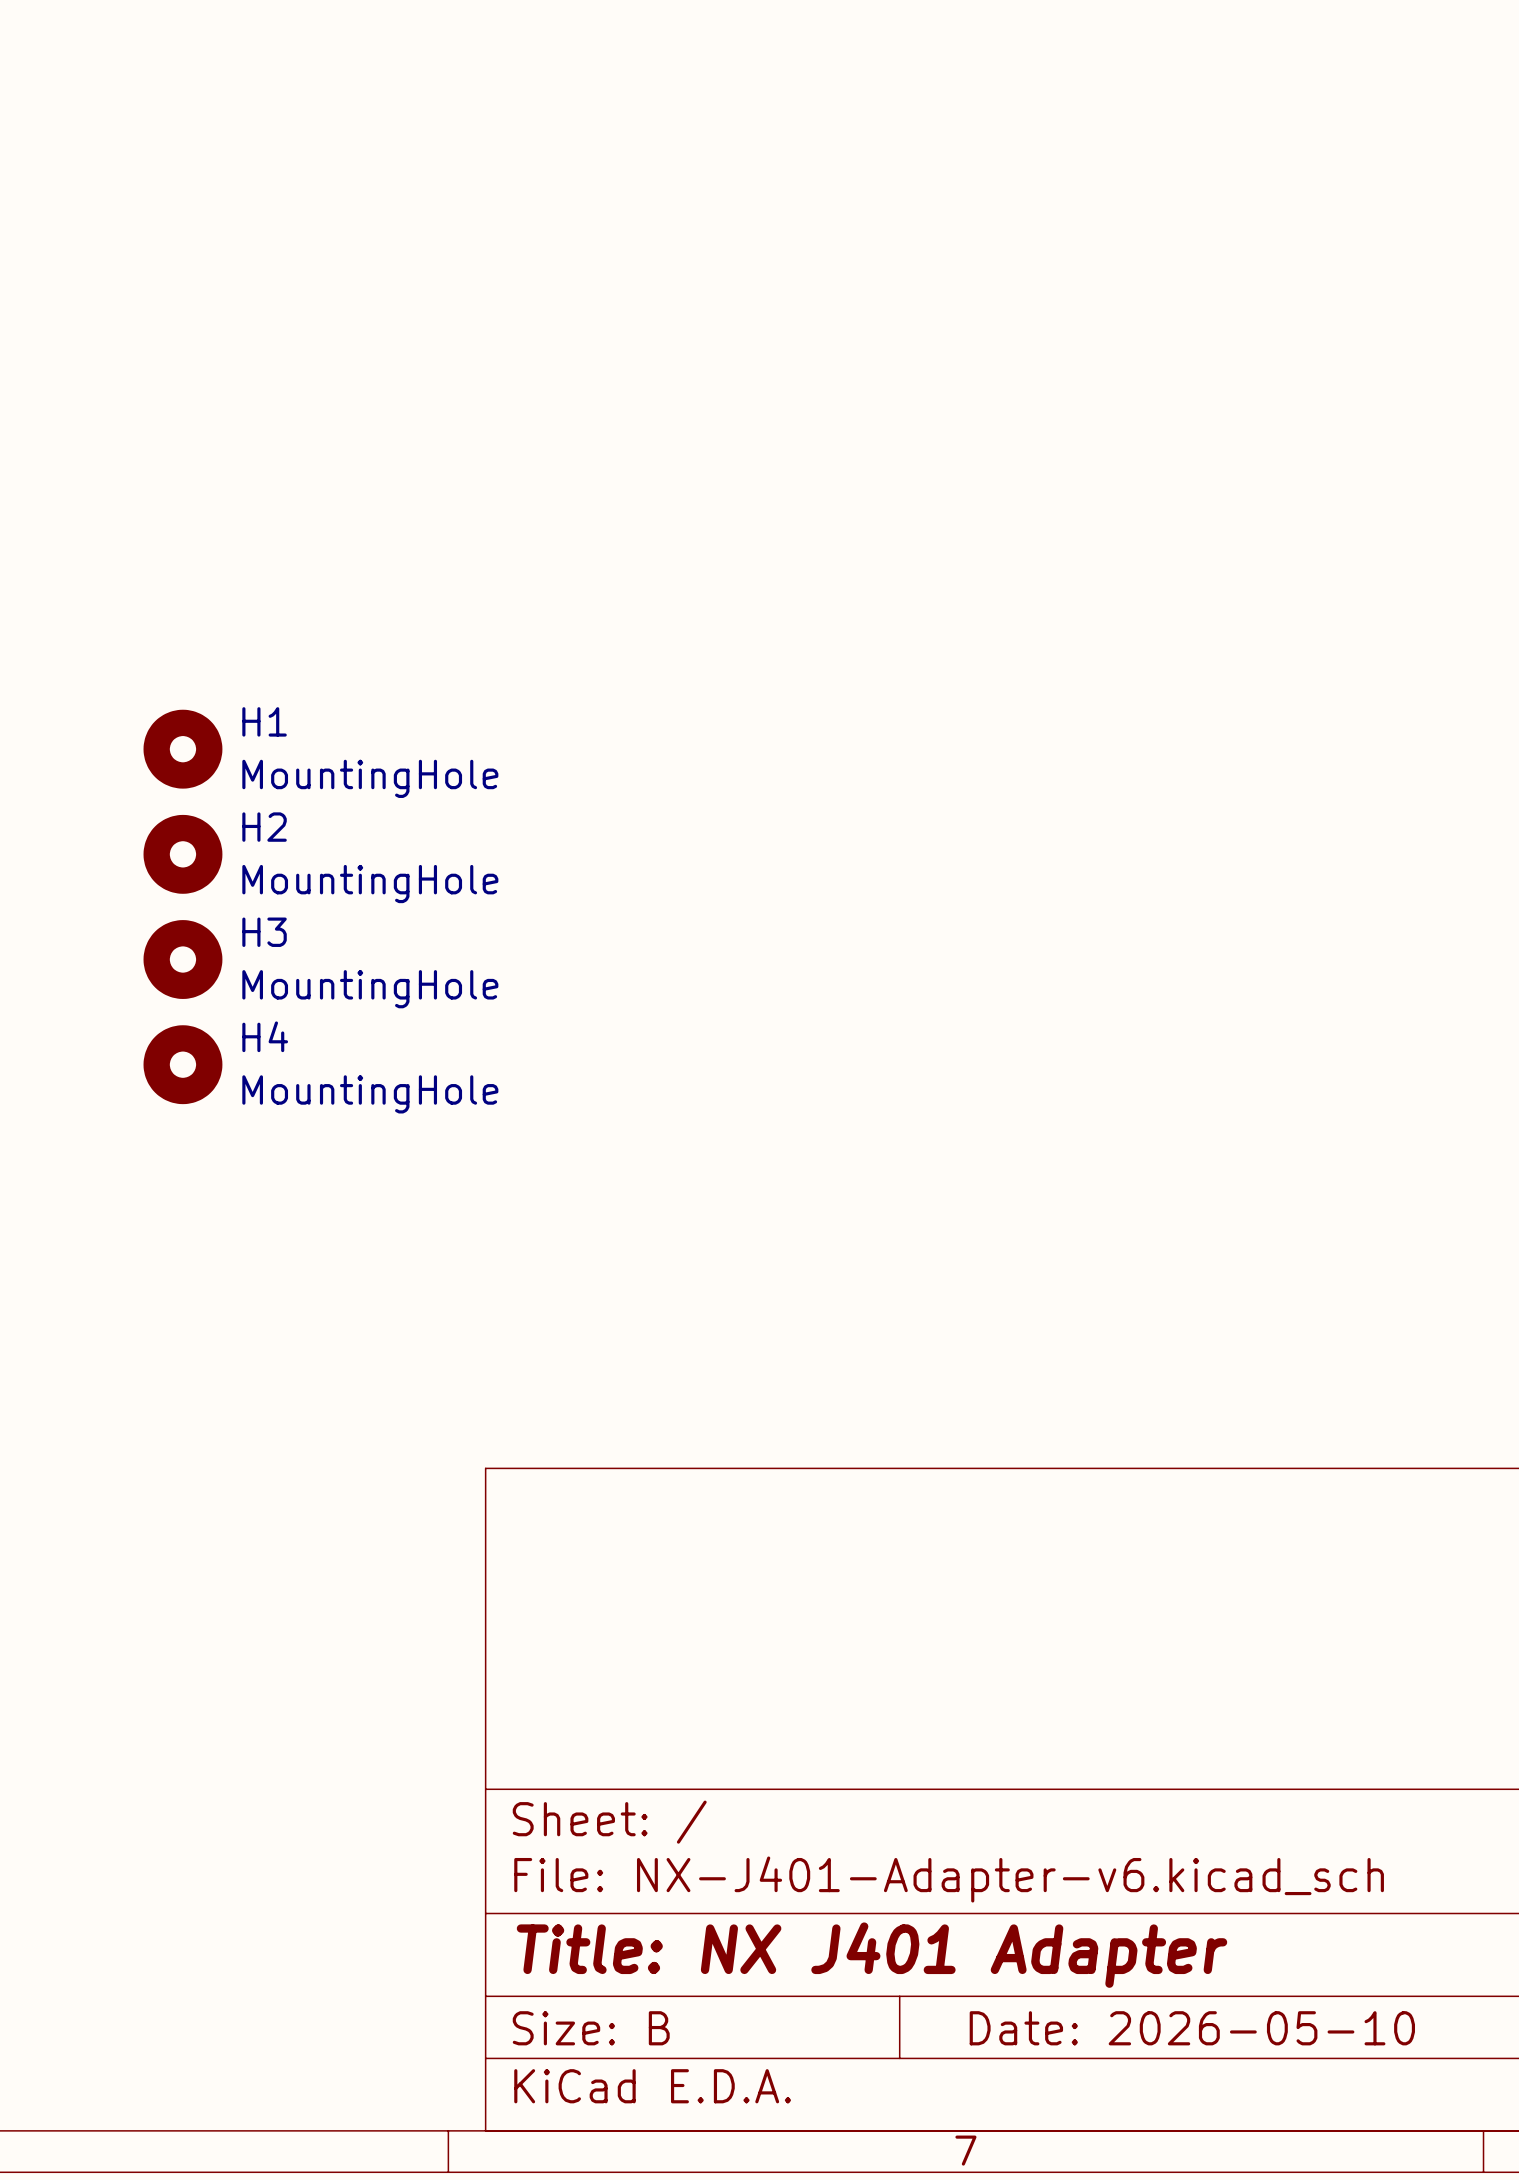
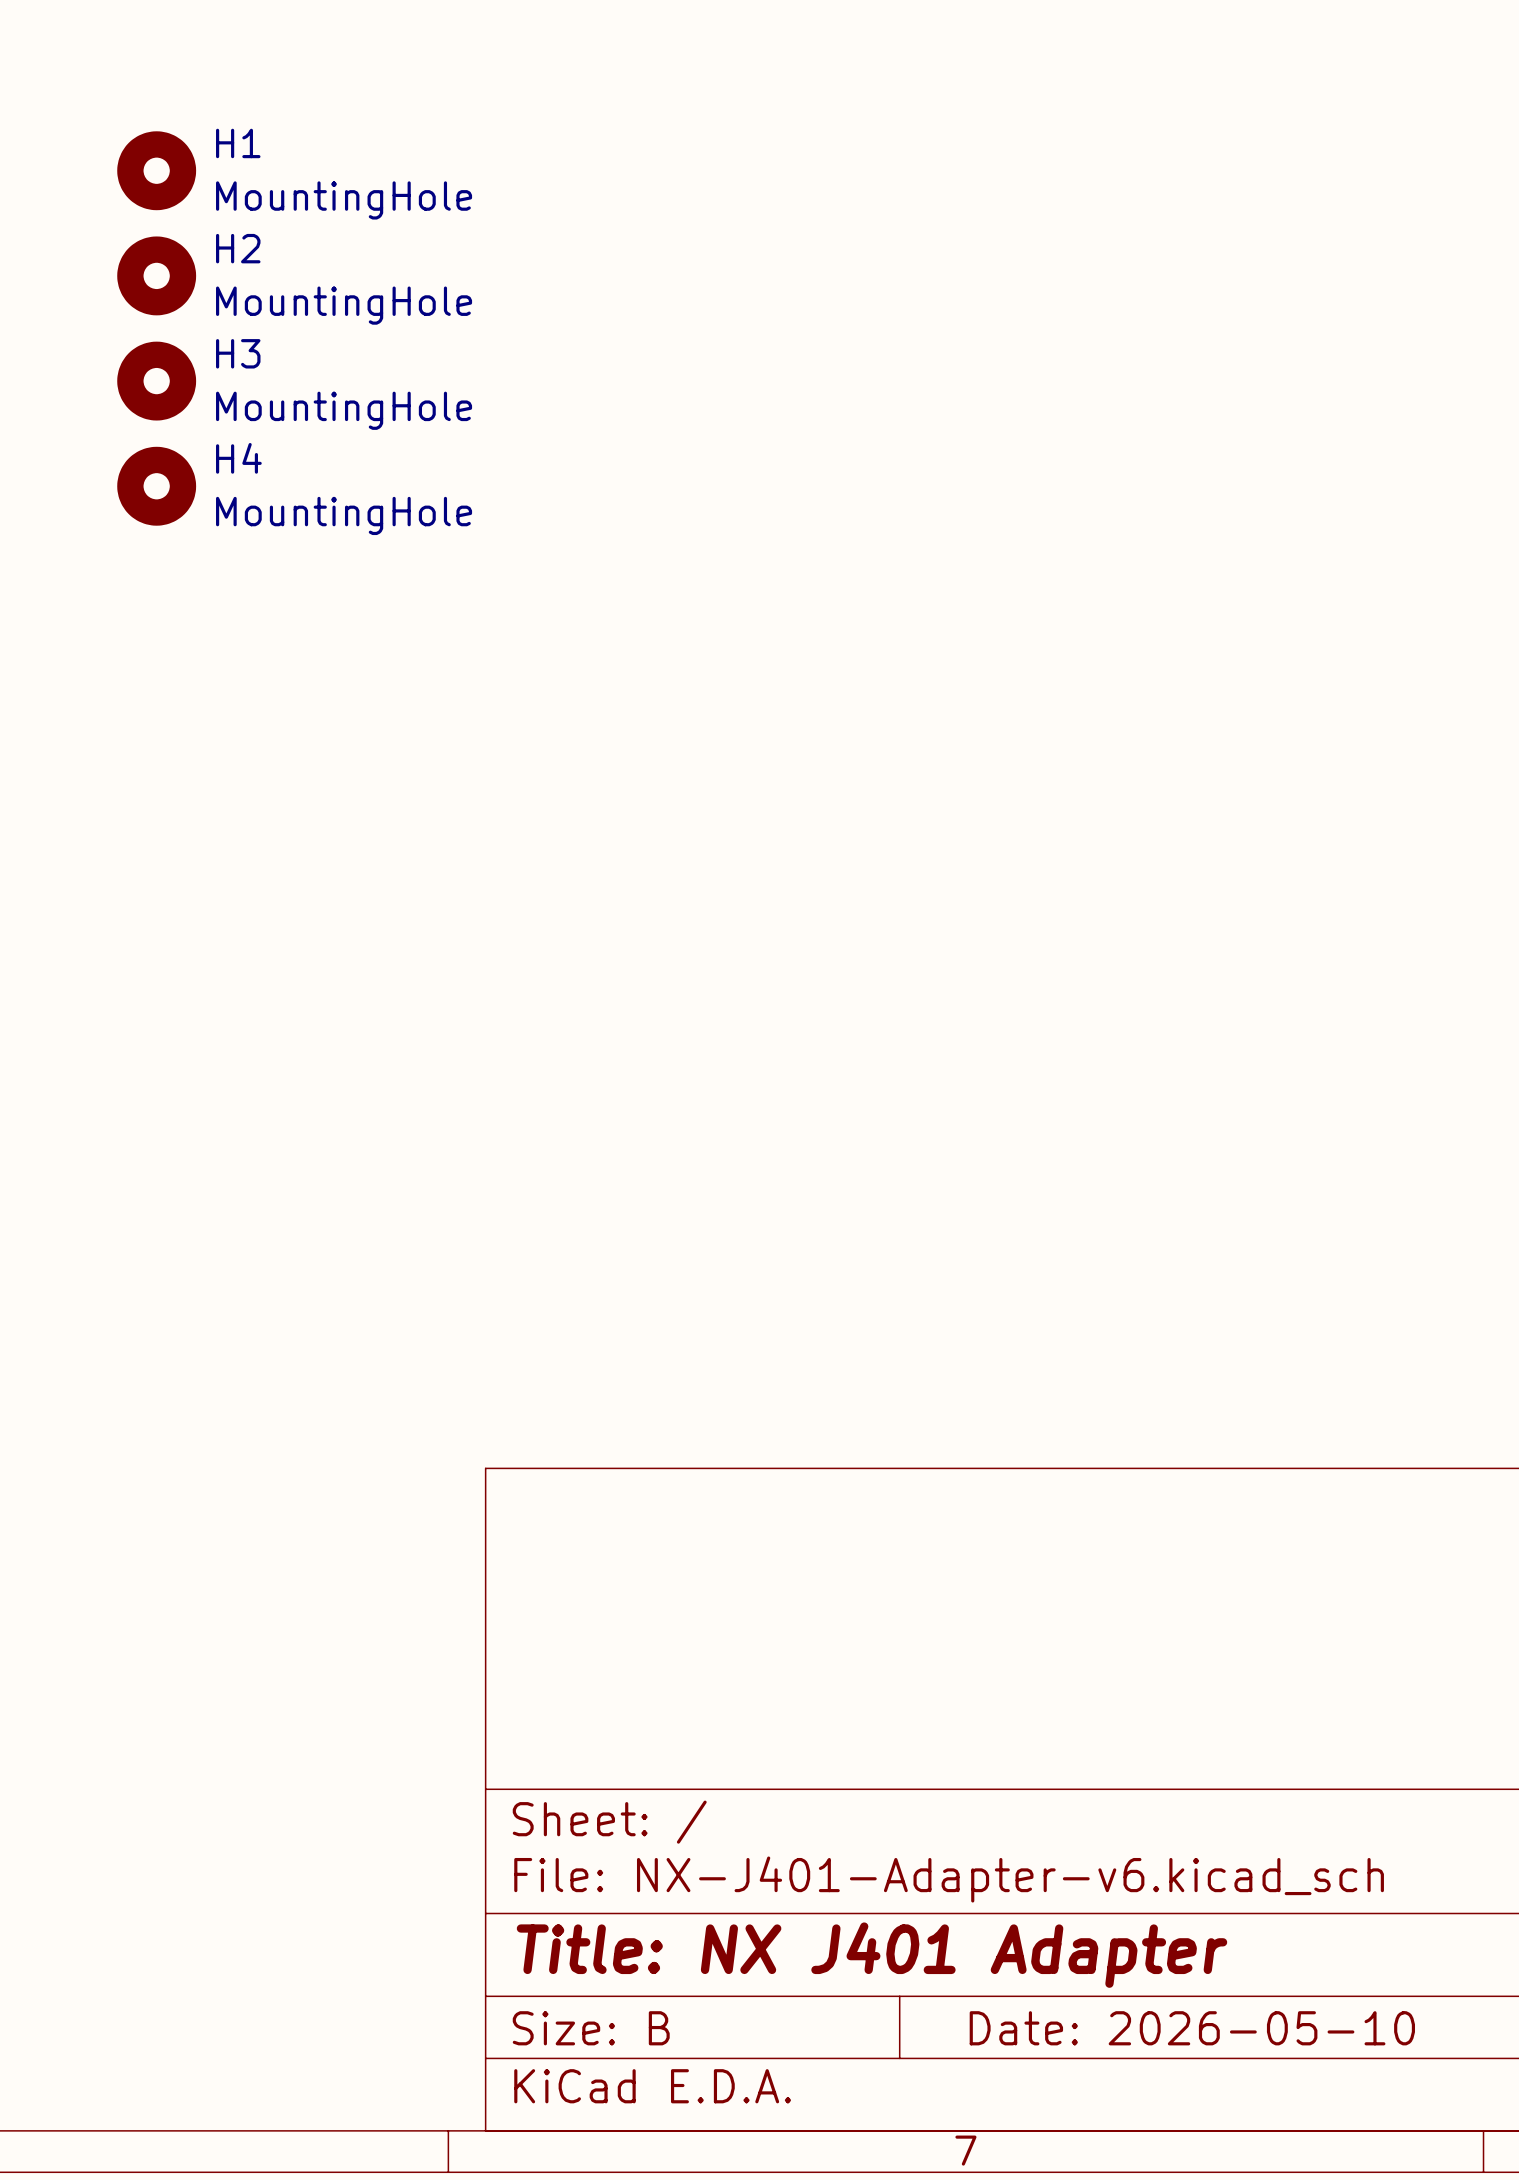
H1 position: (182, 749) -> (156, 170)
H2 position: (182, 854) -> (156, 275)
H3 position: (182, 959) -> (156, 381)
H4 position: (182, 1064) -> (156, 486)

